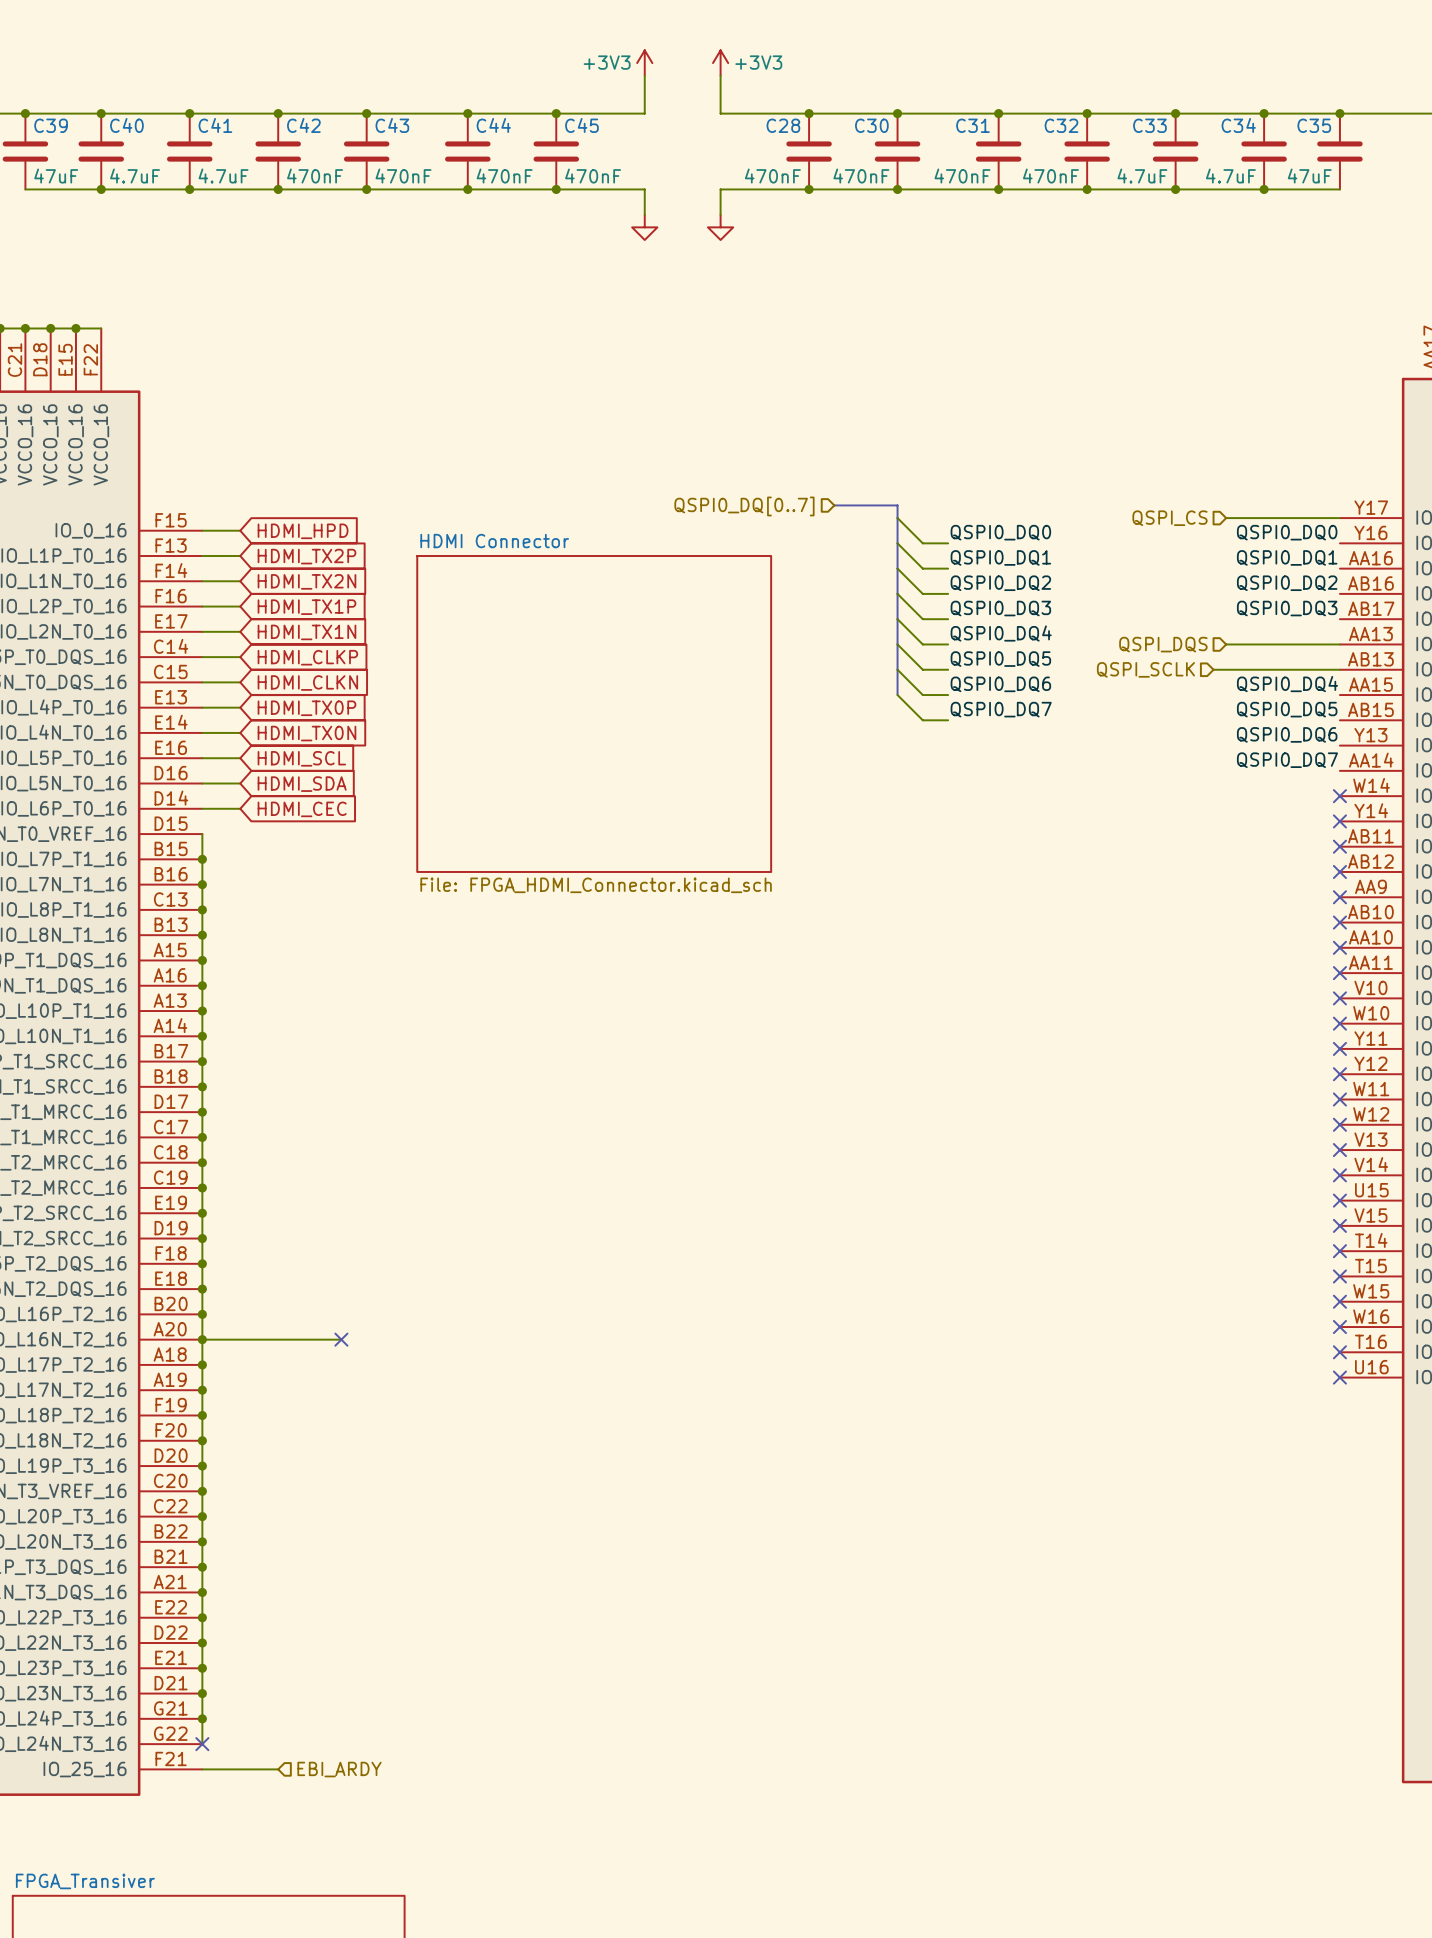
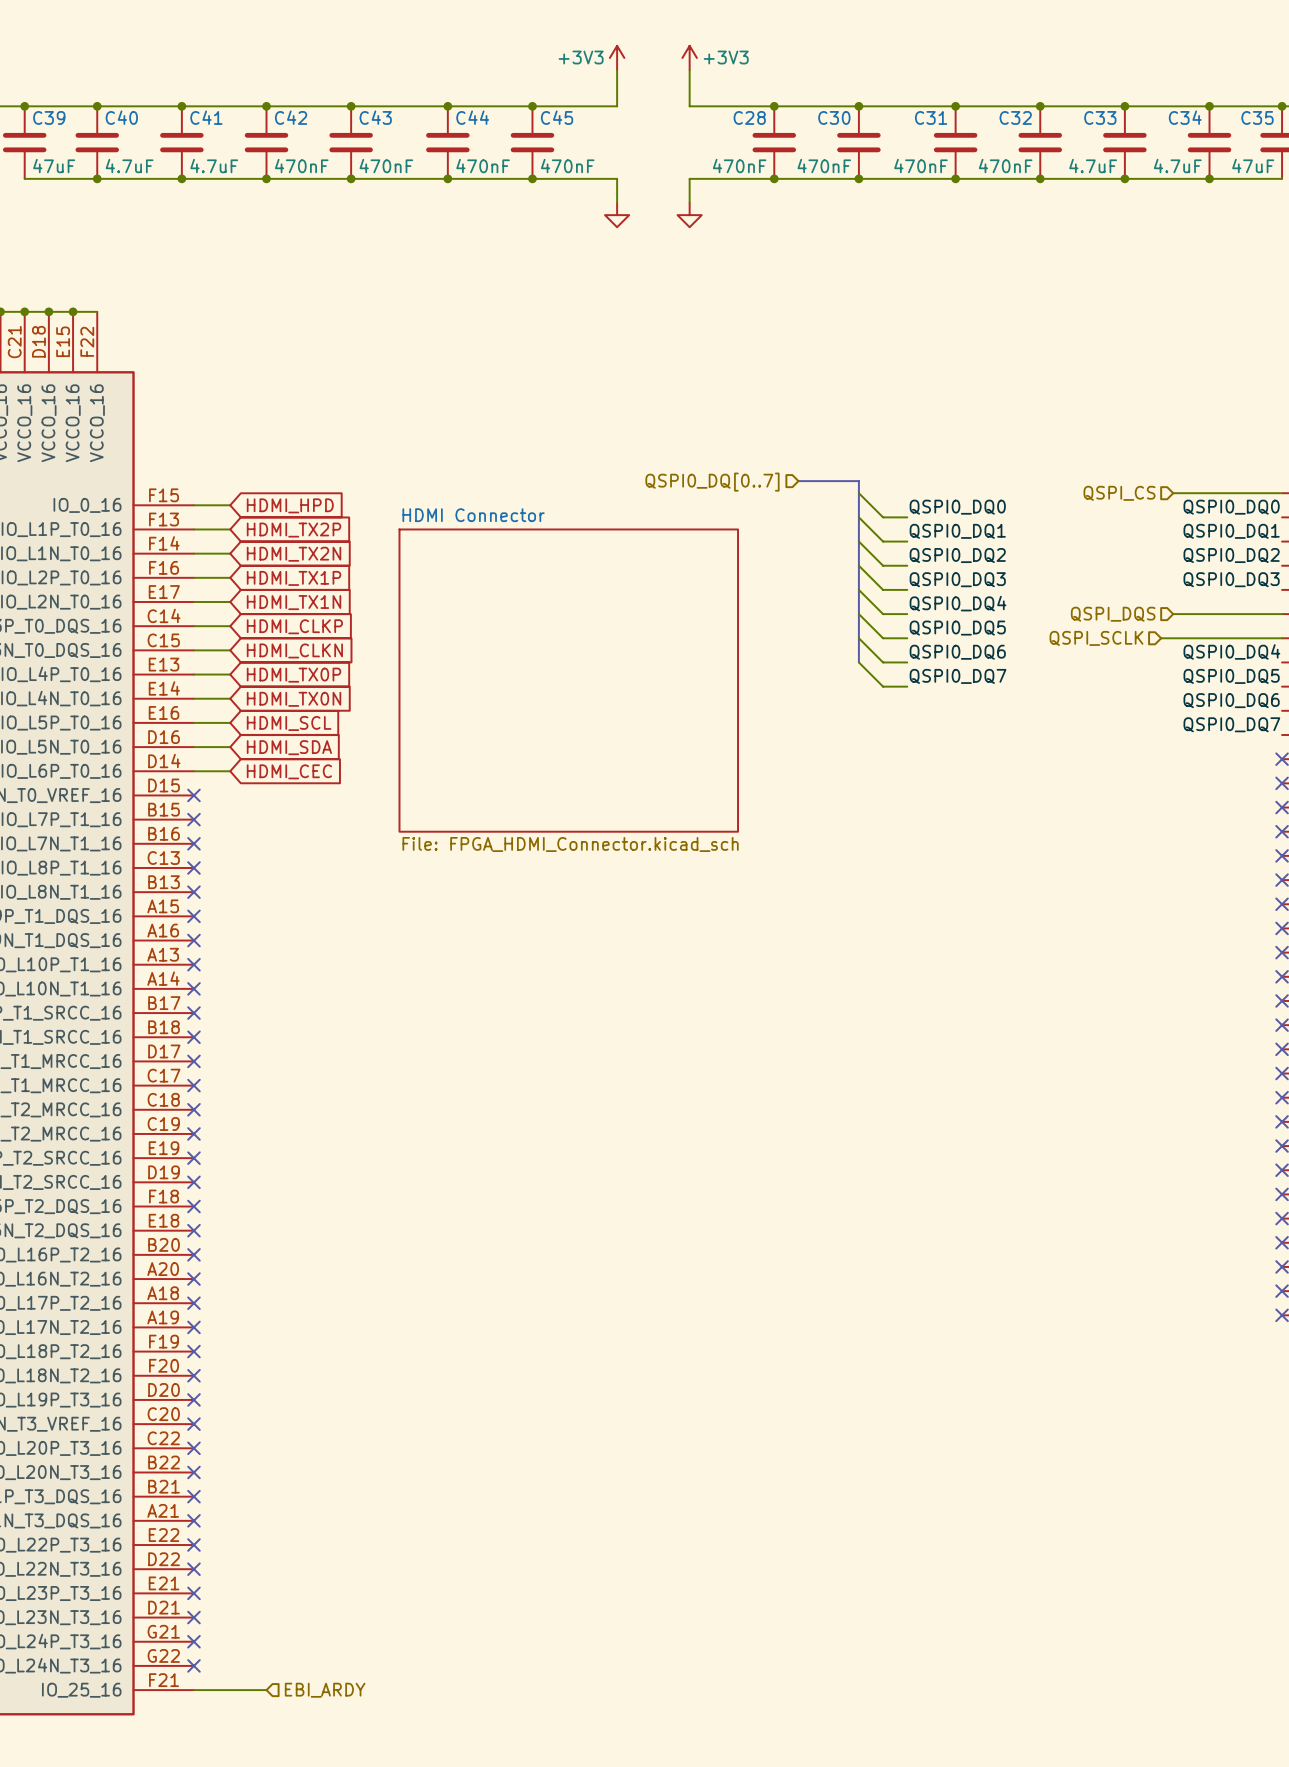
wire: (202, 834) (202, 1744) -> none
no-connect mark: none -> (193, 795)
junction: (202, 859) -> none
no-connect mark: none -> (193, 819)
junction: (202, 884) -> none
no-connect mark: none -> (193, 843)
junction: (202, 909) -> none
no-connect mark: none -> (193, 867)
junction: (202, 935) -> none
no-connect mark: none -> (193, 892)
junction: (202, 960) -> none
no-connect mark: none -> (193, 916)
junction: (202, 985) -> none
no-connect mark: none -> (193, 940)
junction: (202, 1011) -> none
no-connect mark: none -> (193, 964)
junction: (202, 1036) -> none
no-connect mark: none -> (193, 988)
junction: (202, 1061) -> none
no-connect mark: none -> (193, 1013)
junction: (202, 1086) -> none
no-connect mark: none -> (193, 1037)
junction: (202, 1112) -> none
no-connect mark: none -> (193, 1061)
junction: (202, 1137) -> none
no-connect mark: none -> (193, 1085)
junction: (202, 1162) -> none
no-connect mark: none -> (193, 1109)
junction: (202, 1187) -> none
no-connect mark: none -> (193, 1133)
junction: (202, 1213) -> none
no-connect mark: none -> (193, 1158)
junction: (202, 1238) -> none
no-connect mark: none -> (193, 1182)
junction: (202, 1263) -> none
no-connect mark: none -> (193, 1206)
junction: (202, 1289) -> none
no-connect mark: none -> (193, 1230)
junction: (202, 1314) -> none
no-connect mark: none -> (193, 1254)
wire: (202, 1339) (341, 1339) -> none
junction: (202, 1339) -> none
no-connect mark: none -> (193, 1279)
no-connect mark: (341, 1339) -> none
junction: (202, 1364) -> none
no-connect mark: none -> (193, 1303)
junction: (202, 1390) -> none
no-connect mark: none -> (193, 1327)
junction: (202, 1415) -> none
no-connect mark: none -> (193, 1351)
junction: (202, 1440) -> none
no-connect mark: none -> (193, 1375)
junction: (202, 1466) -> none
no-connect mark: none -> (193, 1399)
junction: (202, 1491) -> none
no-connect mark: none -> (193, 1424)
junction: (202, 1516) -> none
no-connect mark: none -> (193, 1448)
junction: (202, 1541) -> none
no-connect mark: none -> (193, 1472)
junction: (202, 1567) -> none
no-connect mark: none -> (193, 1496)
junction: (202, 1592) -> none
no-connect mark: none -> (193, 1520)
junction: (202, 1617) -> none
no-connect mark: none -> (193, 1545)
junction: (202, 1643) -> none
no-connect mark: none -> (193, 1569)
junction: (202, 1668) -> none
no-connect mark: none -> (193, 1593)
junction: (202, 1693) -> none
no-connect mark: none -> (193, 1617)
junction: (202, 1718) -> none
no-connect mark: none -> (193, 1641)

